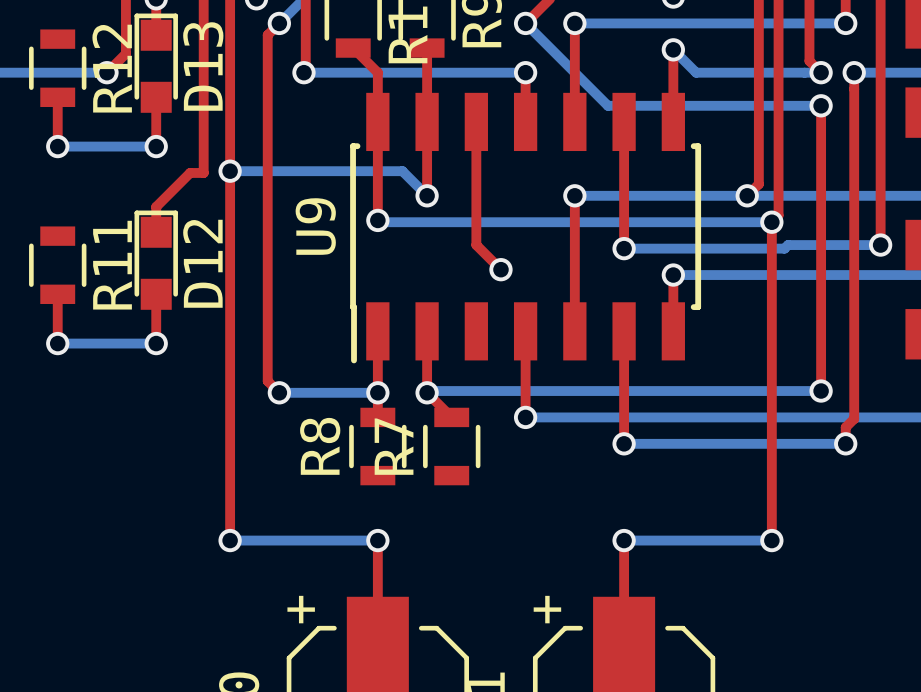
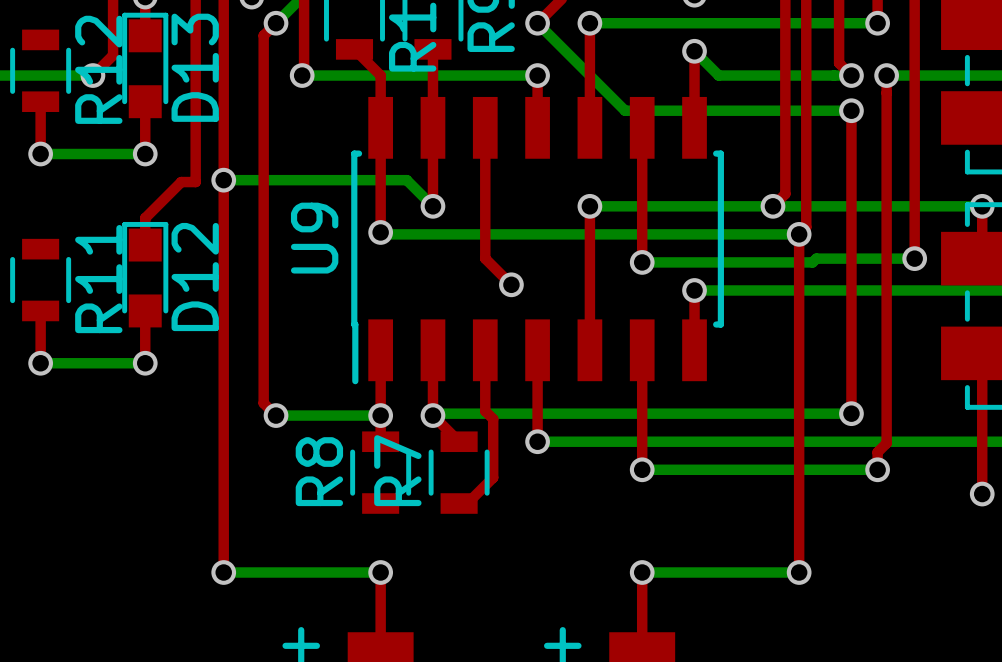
top track: none -> (485, 350) (485, 411) (493, 419) (493, 477) (467, 503) (459, 503)

